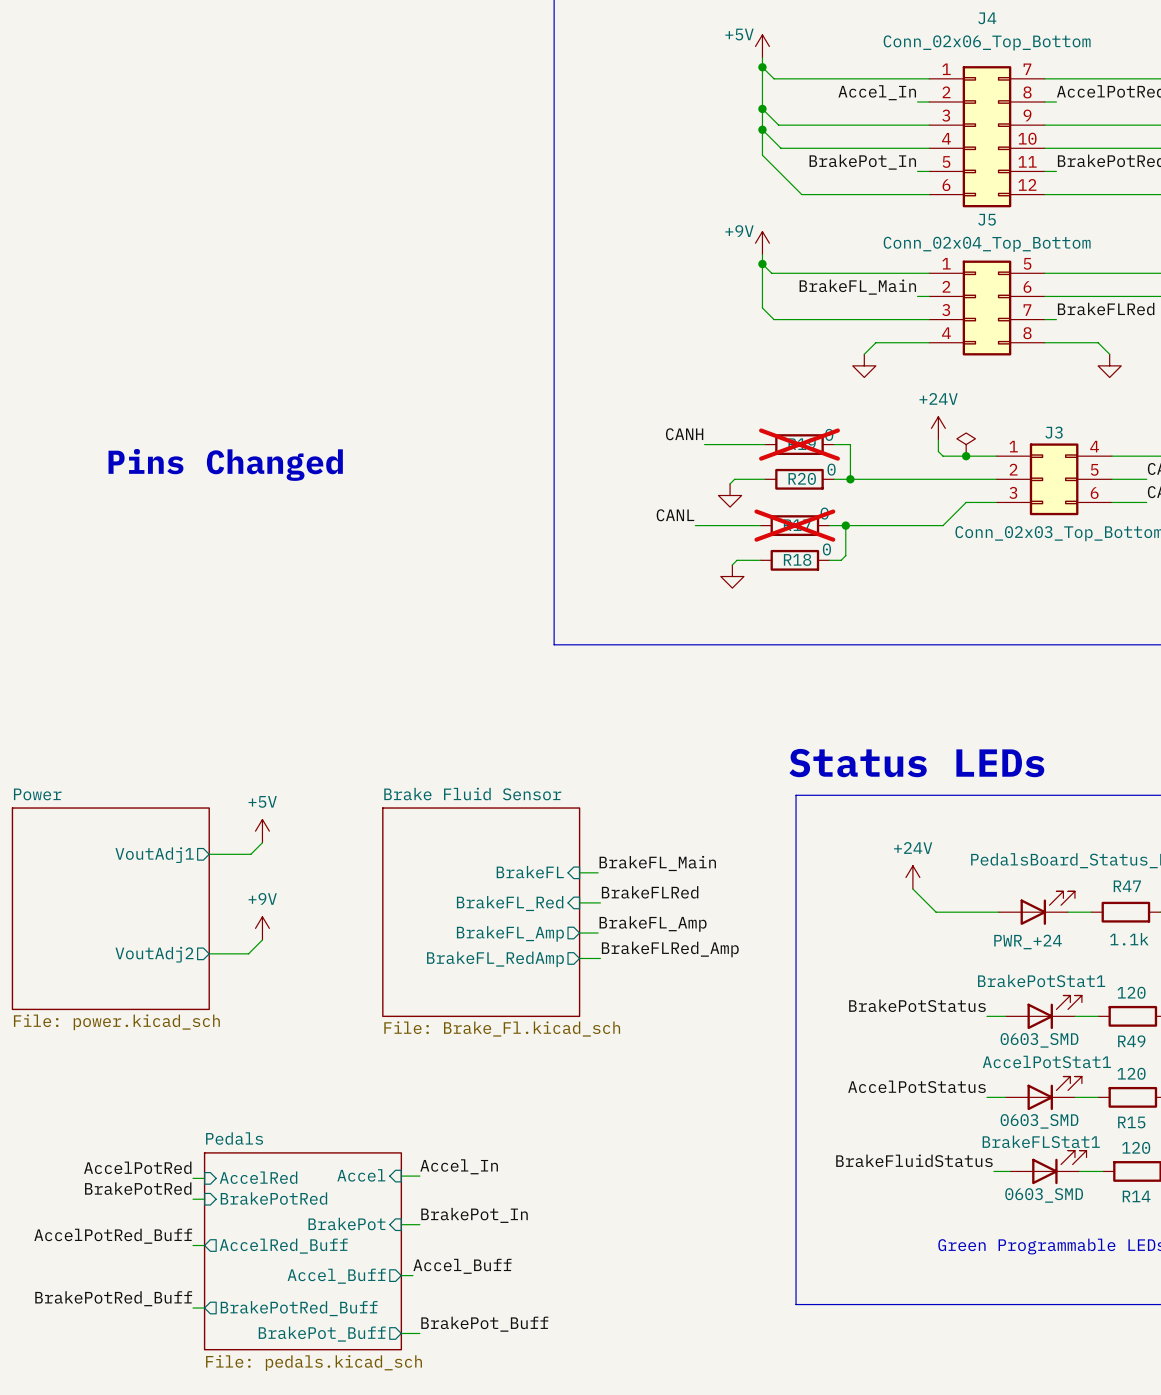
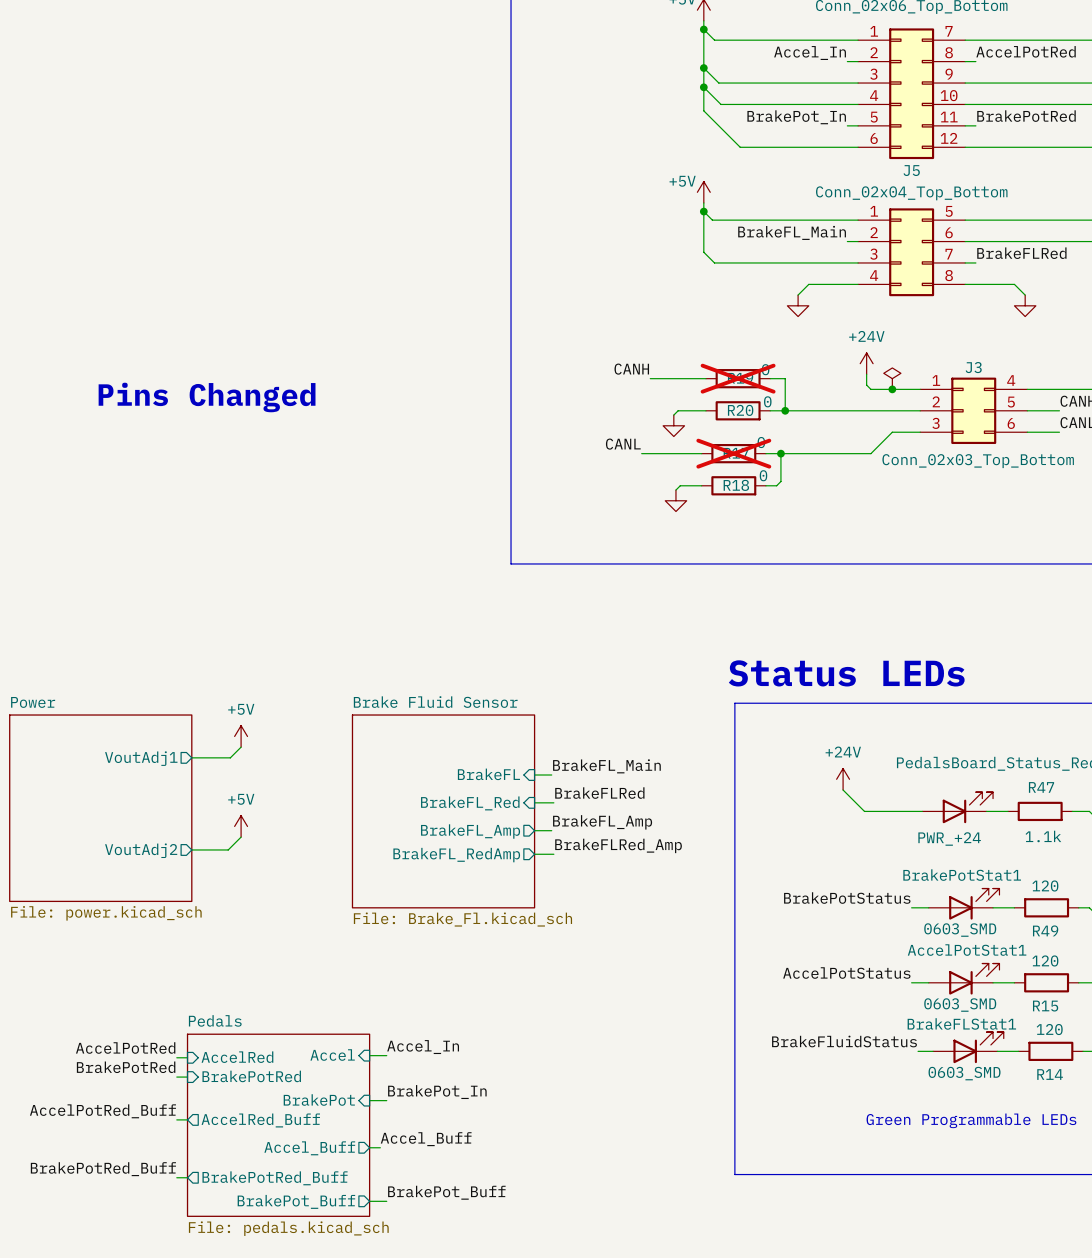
power symbol: +9V (762, 243) -> +5V (703, 192)
power symbol: +9V (262, 928) -> +5V (241, 826)

